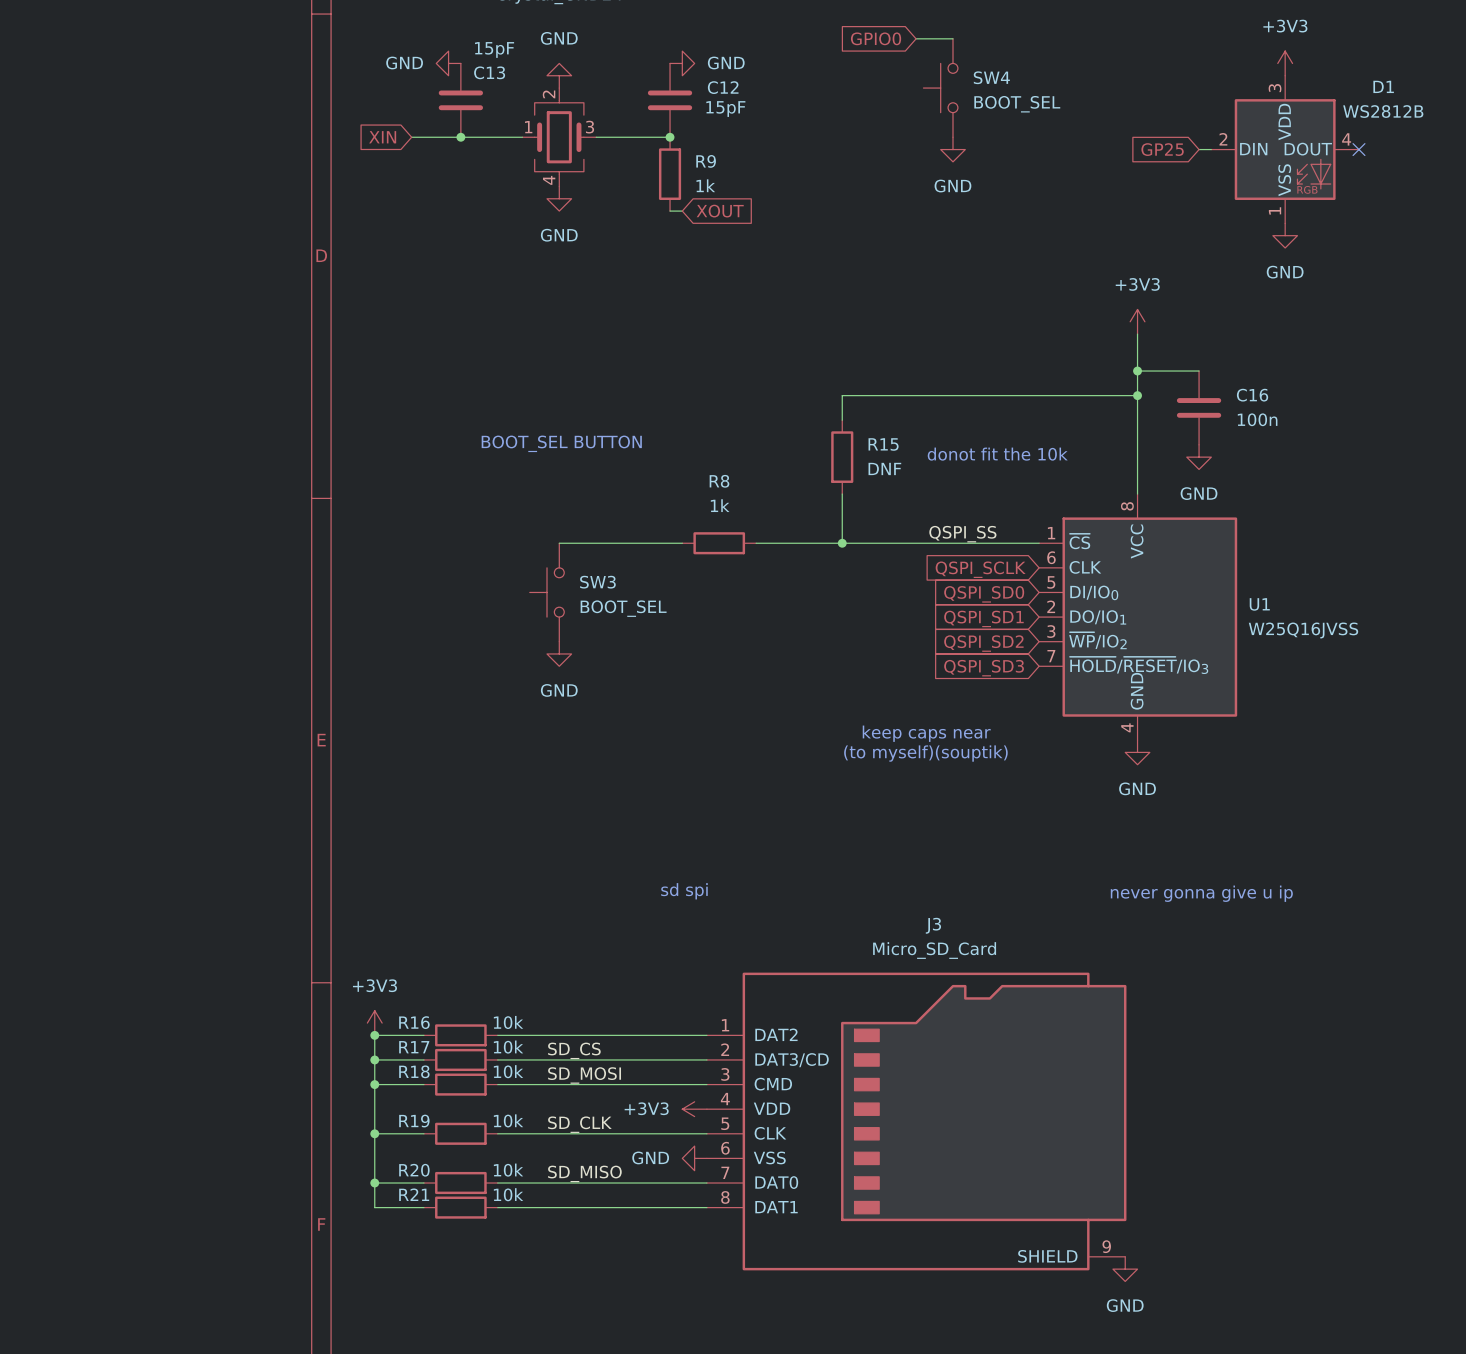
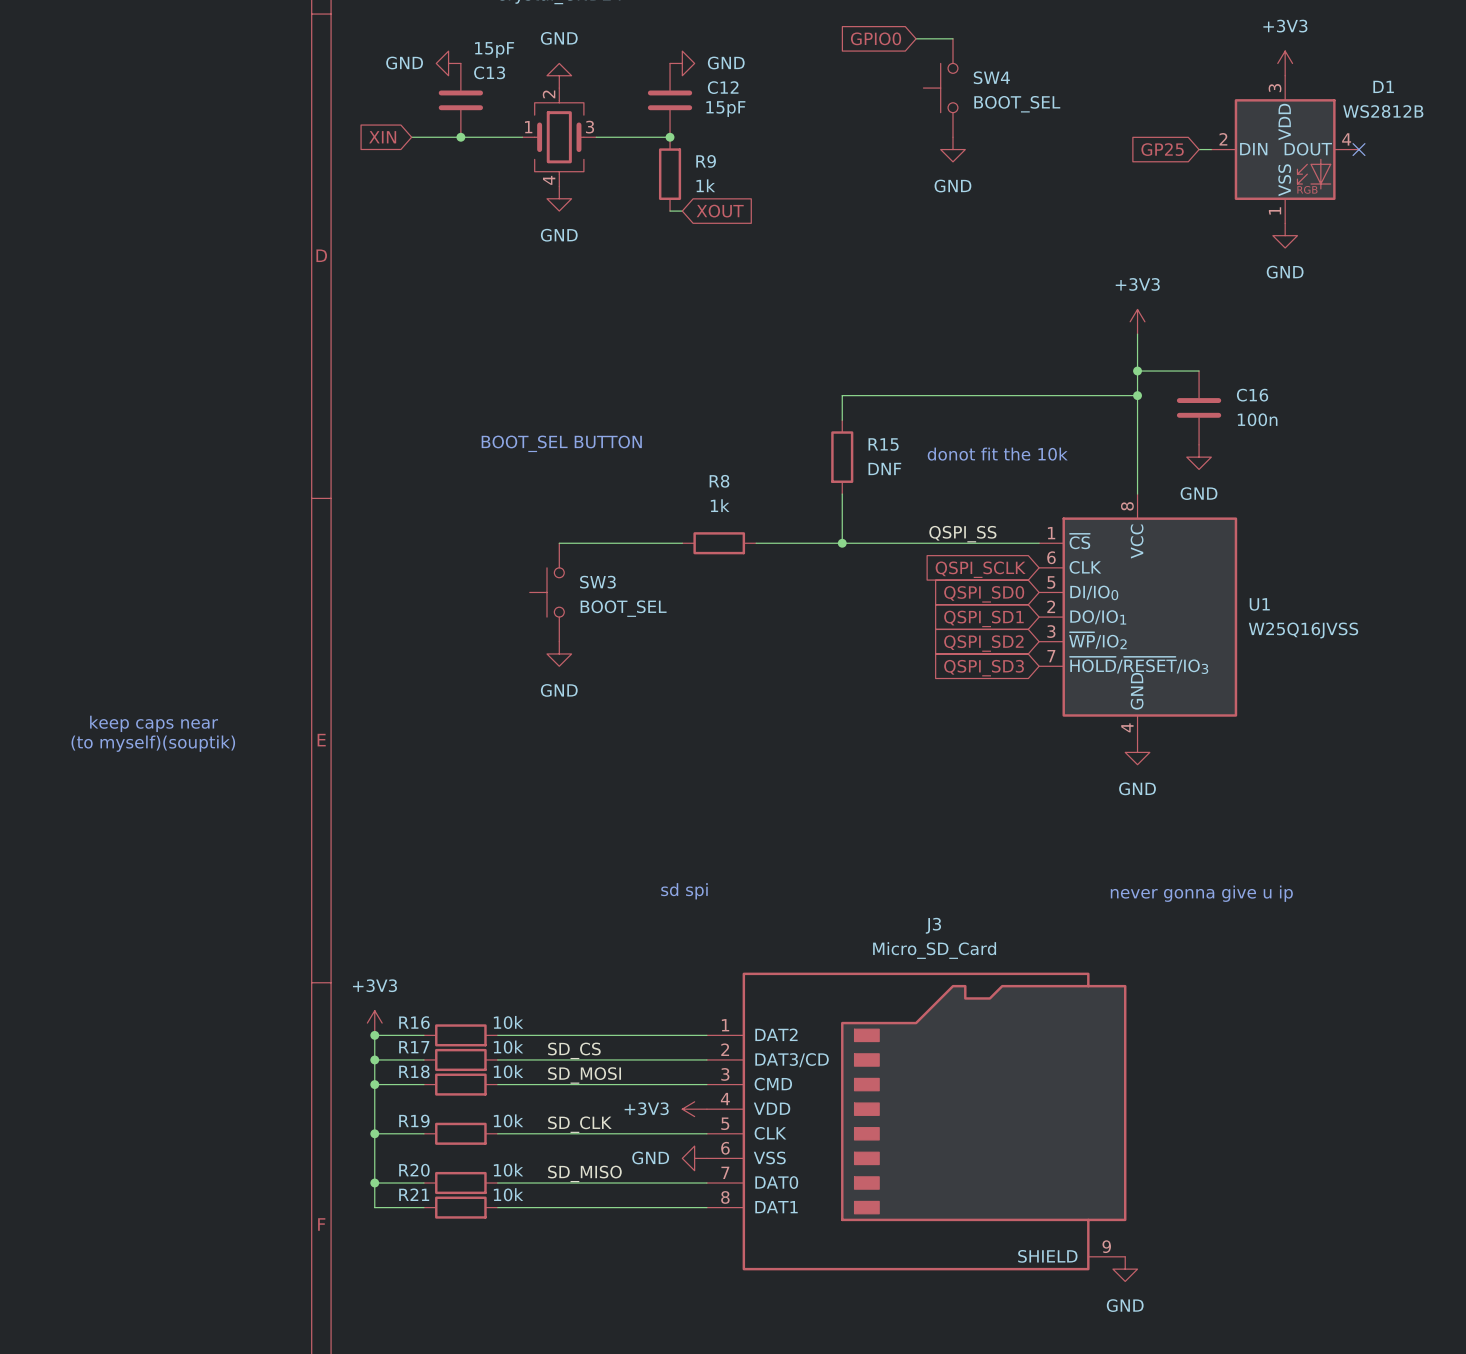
text: none -> keep caps near (154, 723)
text: keep caps near (926, 733) -> none
text: none -> (to myself)(souptik) (153, 743)
text: (to myself)(souptik) (925, 753) -> none

